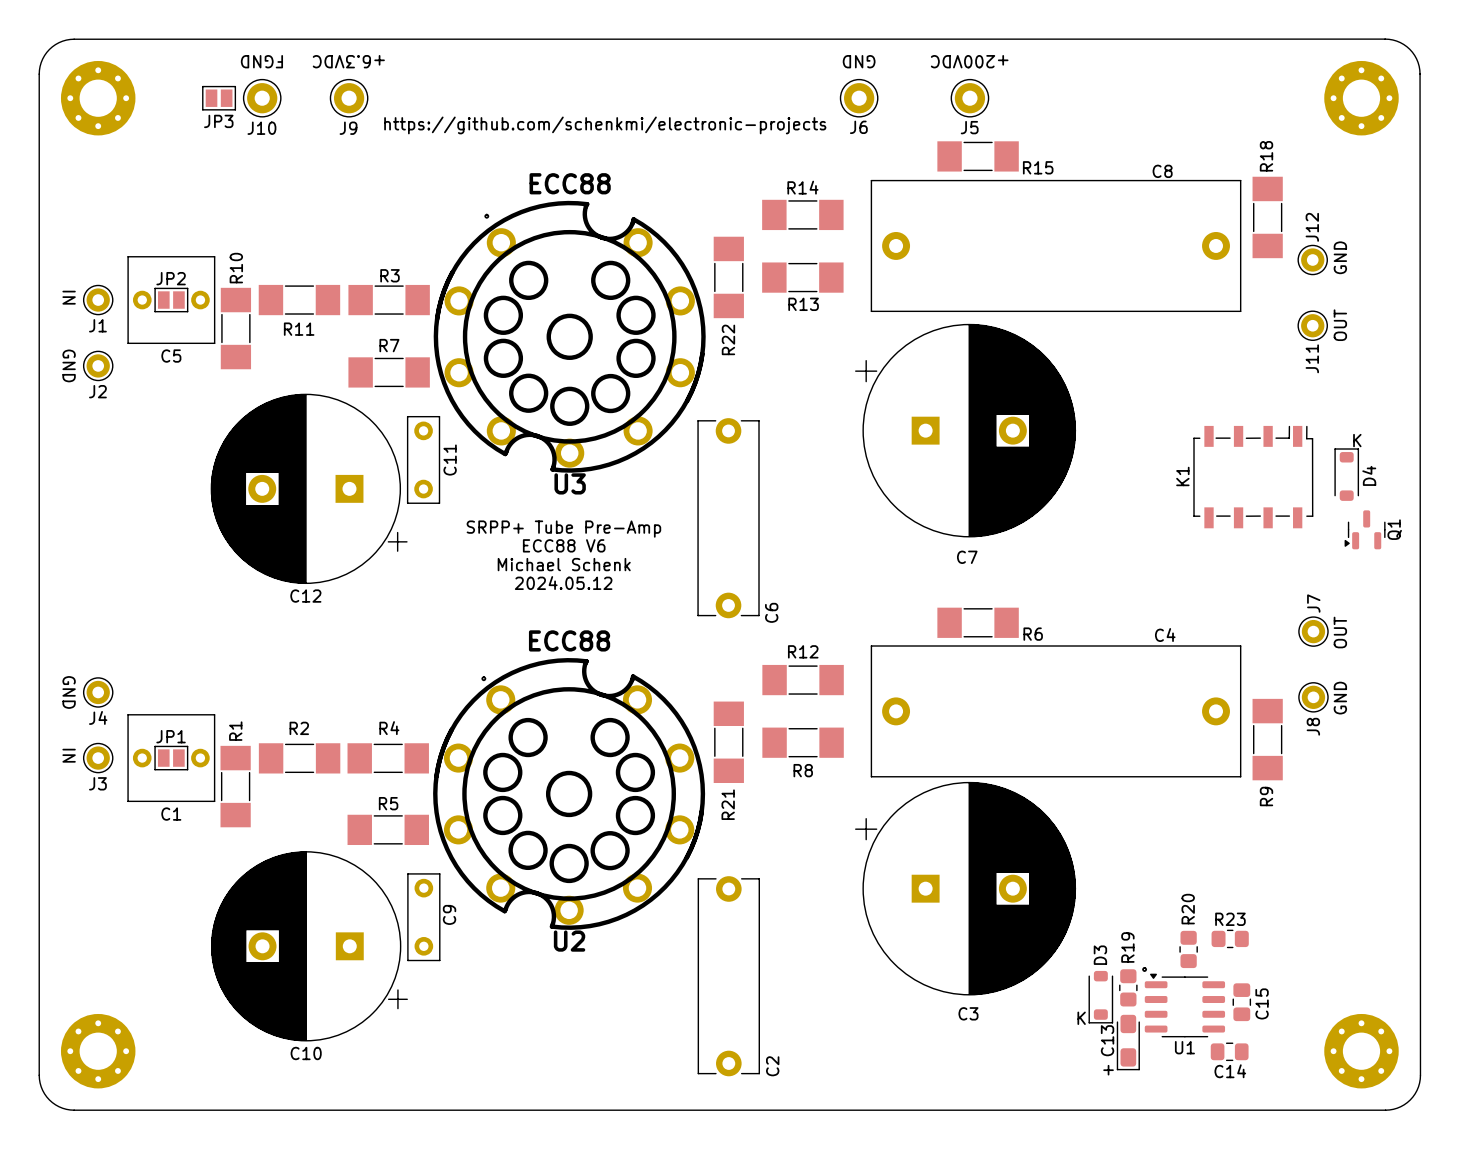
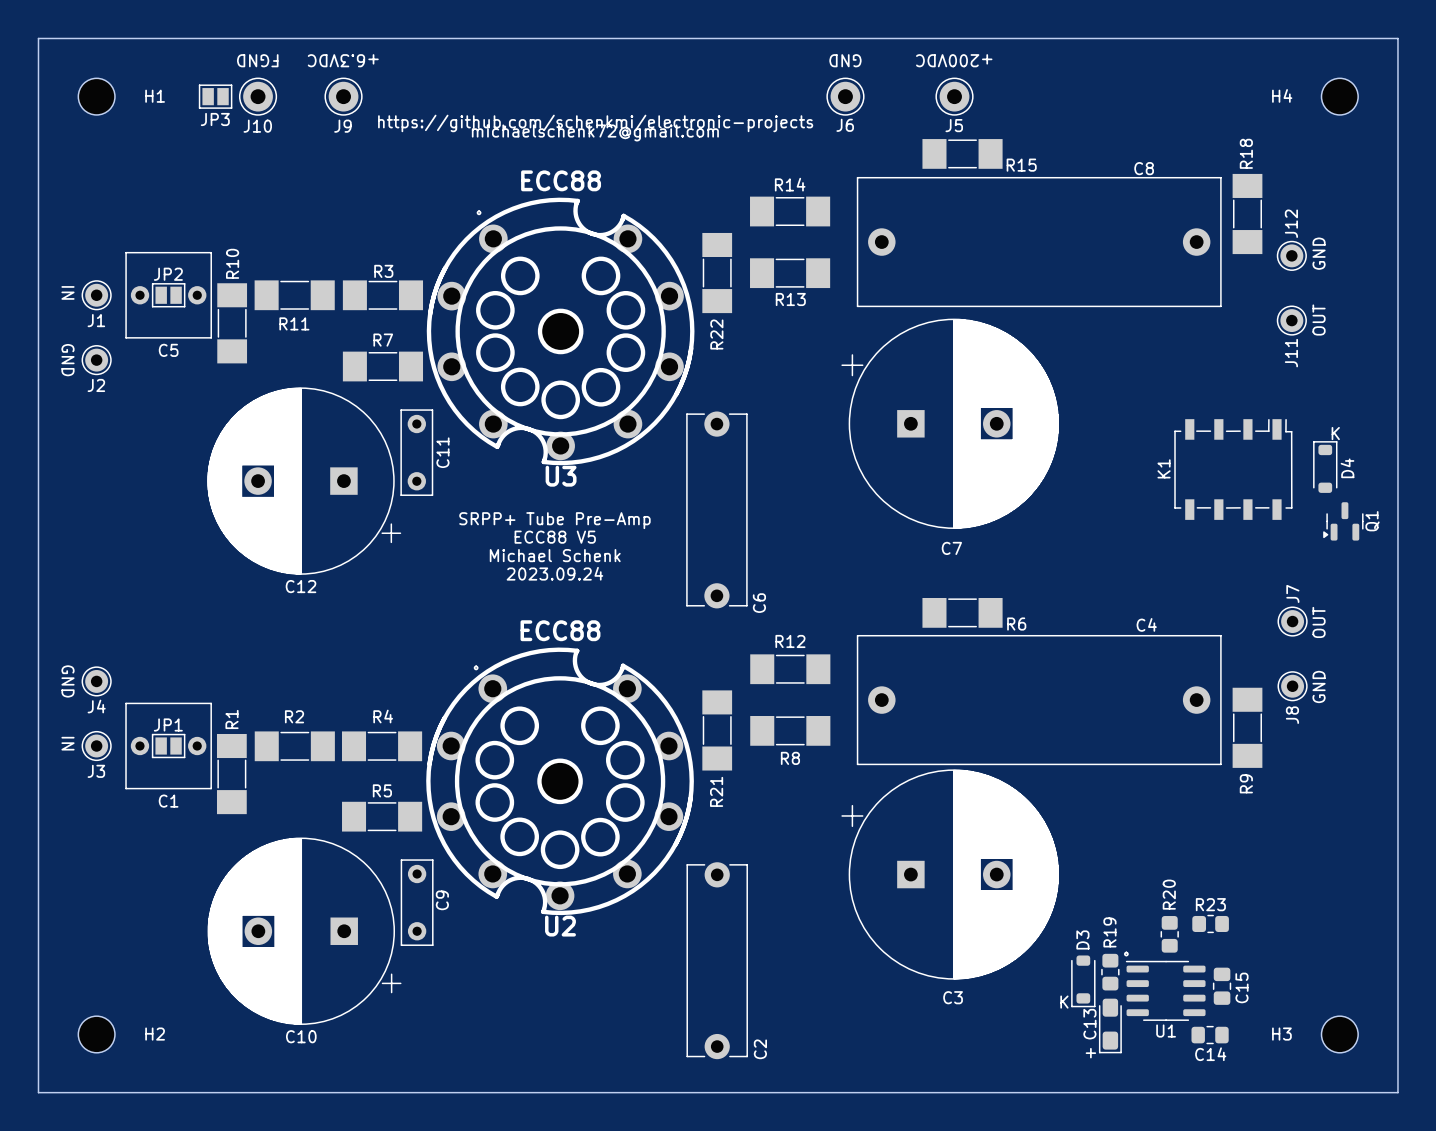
board edge: (1385, 39) (74, 39) (62, 41) (52, 46) (42, 58) (39, 74) (39, 1075) (41, 1086) (46, 1097) (58, 1106) (74, 1110) (1385, 1110) (1397, 1108) (1407, 1102) (1417, 1090) (1420, 1075) (1420, 74) (1416, 58) (1409, 49) (1396, 41) (1385, 39) -> (38, 38) (38, 1092) (1397, 1092) (1397, 38) (38, 38)
part: (98, 98) -> none
H1: none -> (96, 96)
part: (1361, 98) -> none
H4: none -> (1339, 96)
text: none -> michaelschenk72@gmail.com (595, 132)
text: ECC88 V6 (564, 545) -> ECC88 V5 (555, 537)
text: 2024.05.12 (563, 583) -> 2023.09.24 (554, 573)
U1 footprint: [1144, 973, 1226, 1038] -> [1125, 960, 1206, 1021]
part: (98, 1051) -> none
H2: none -> (96, 1034)
part: (1361, 1051) -> none
H3: none -> (1339, 1034)

